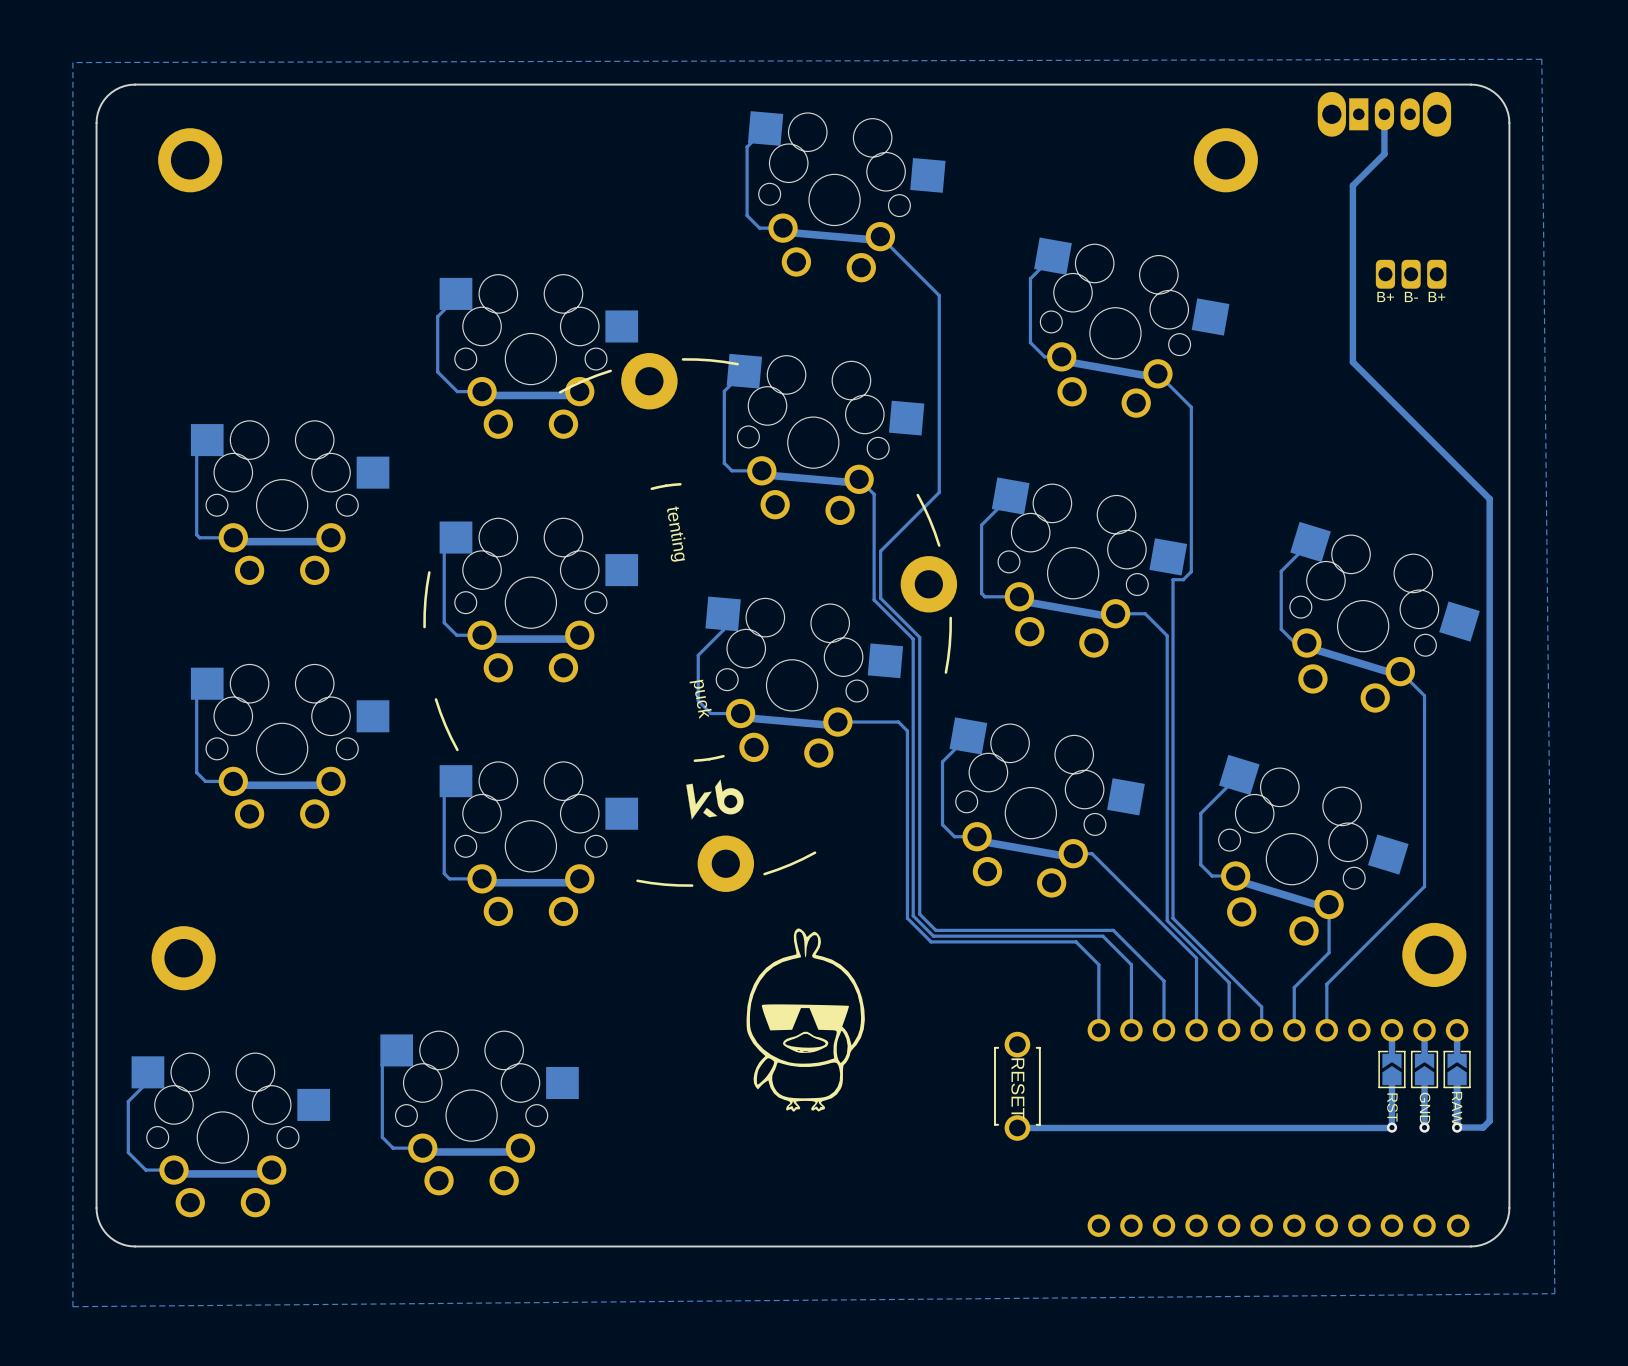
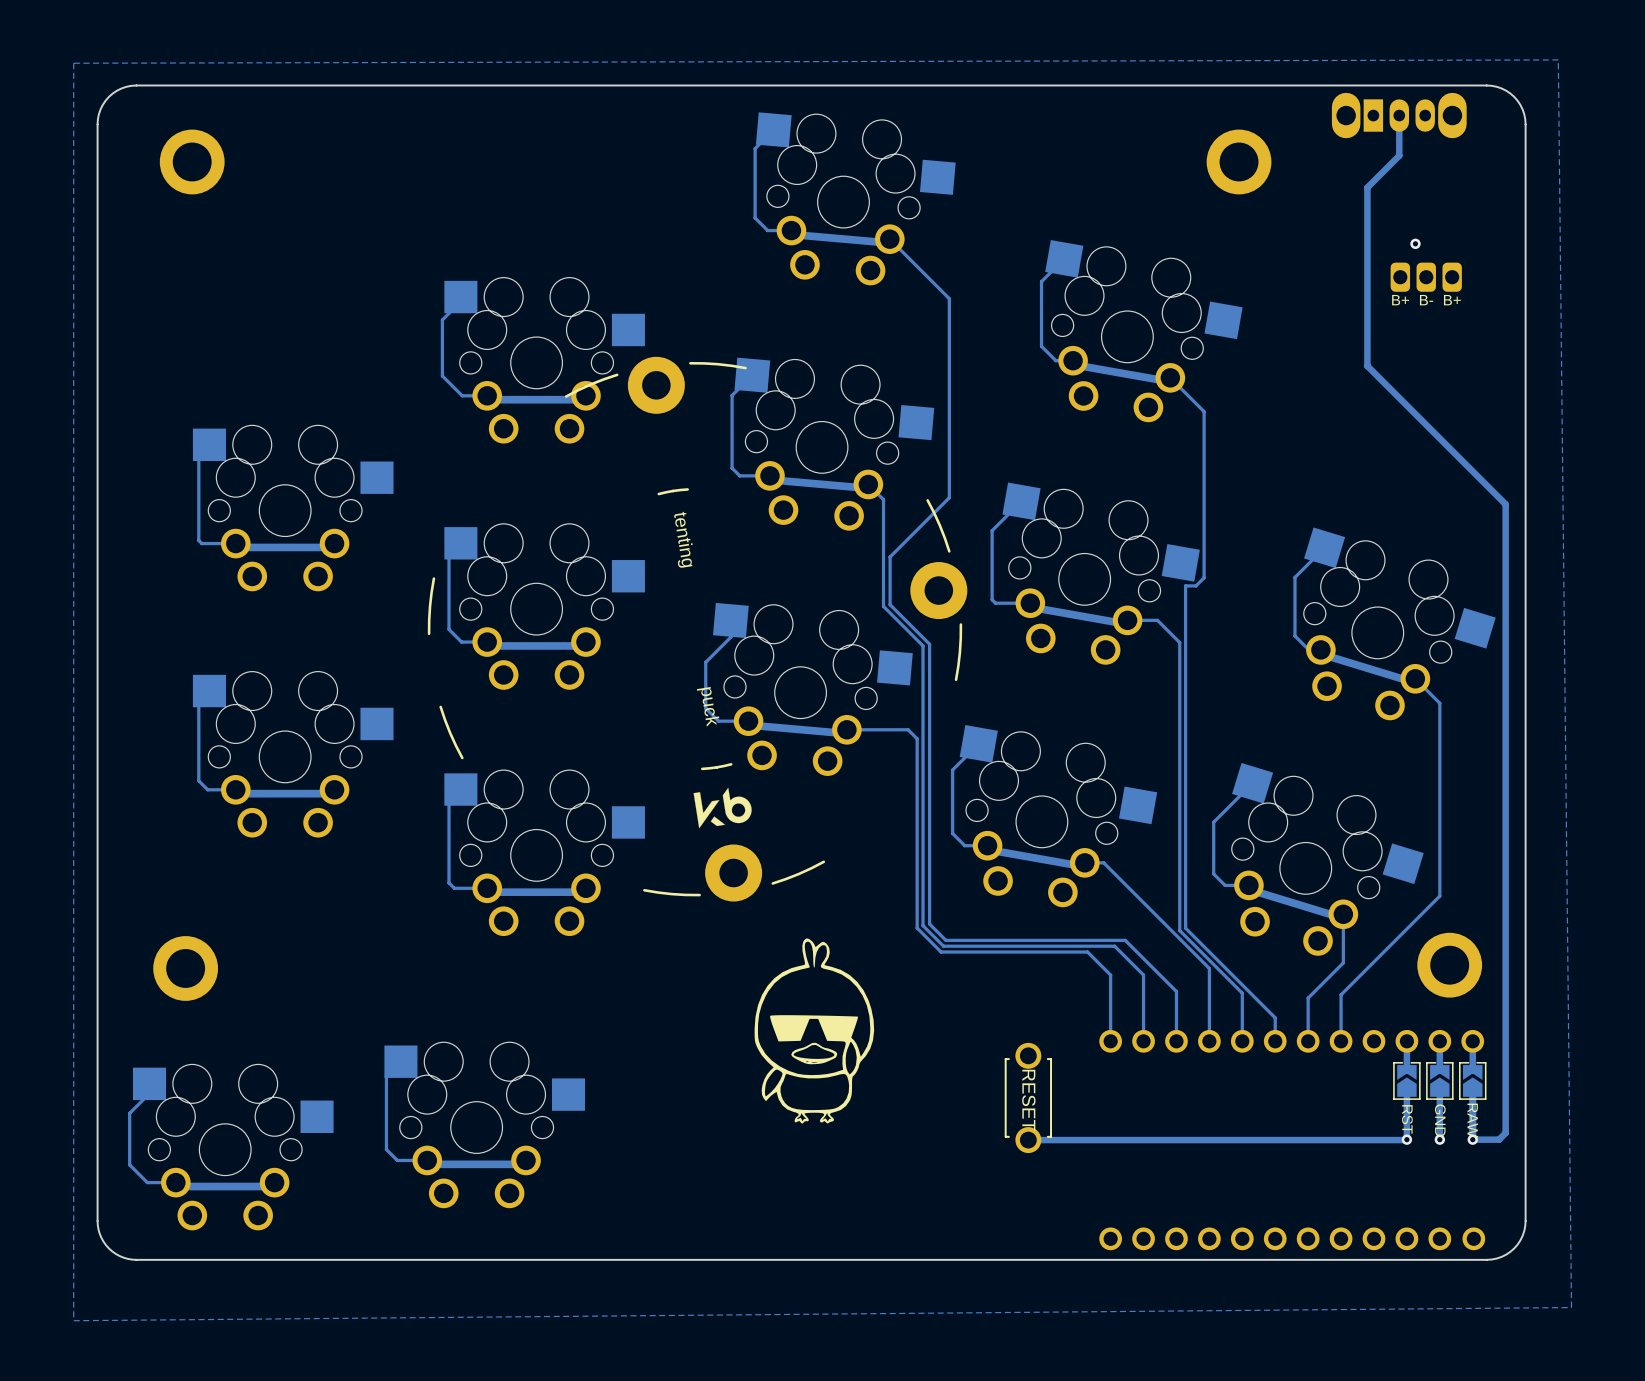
via: none -> (1415, 243)

